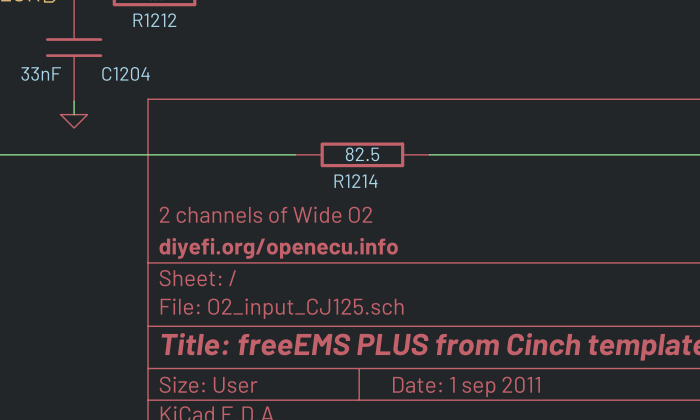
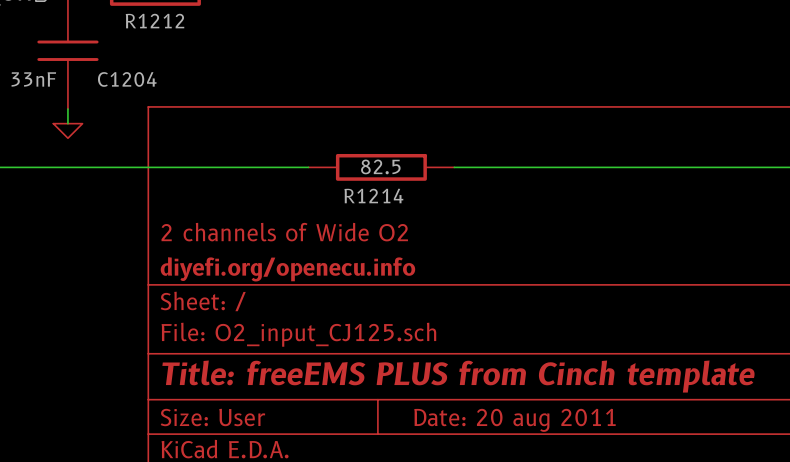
title block: Date: 1 sep 2011 (466, 386) -> Date: 20 aug 2011 (514, 420)

